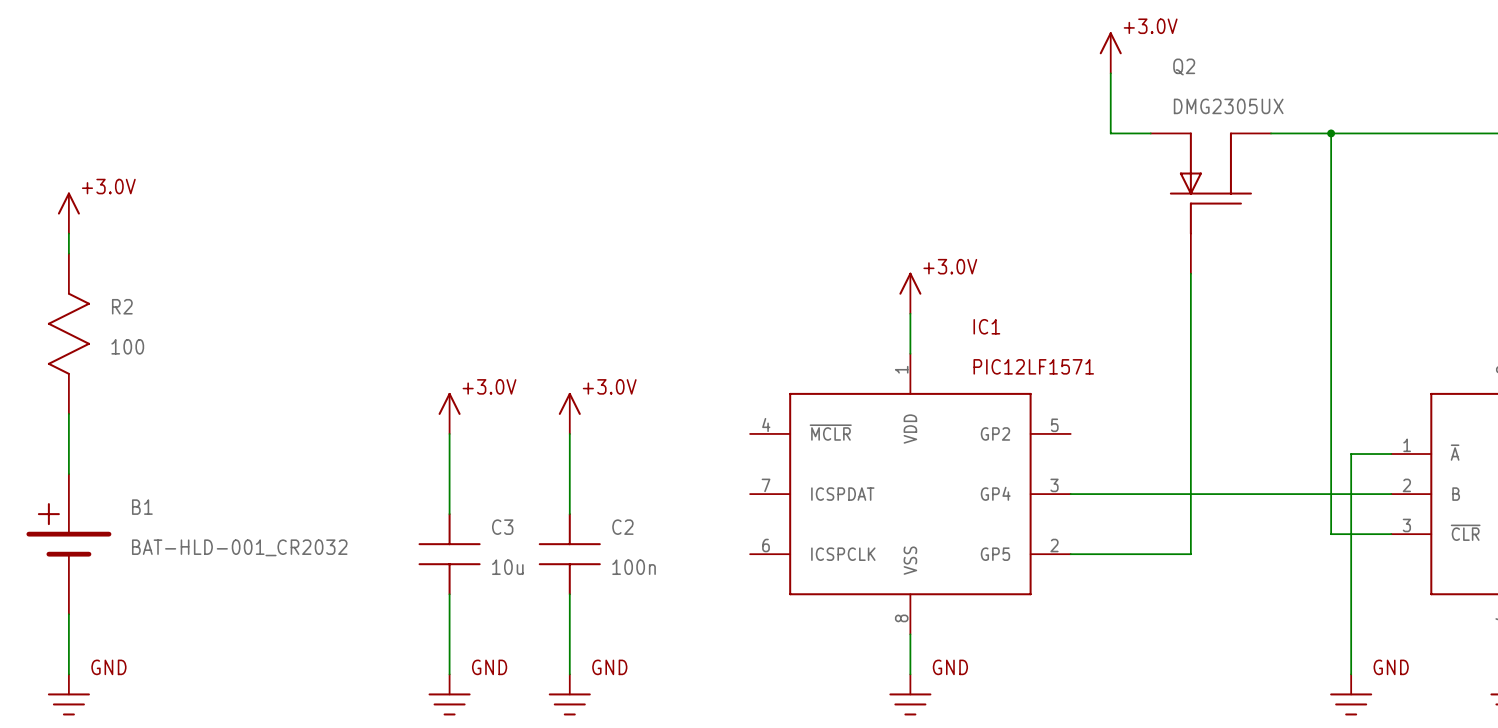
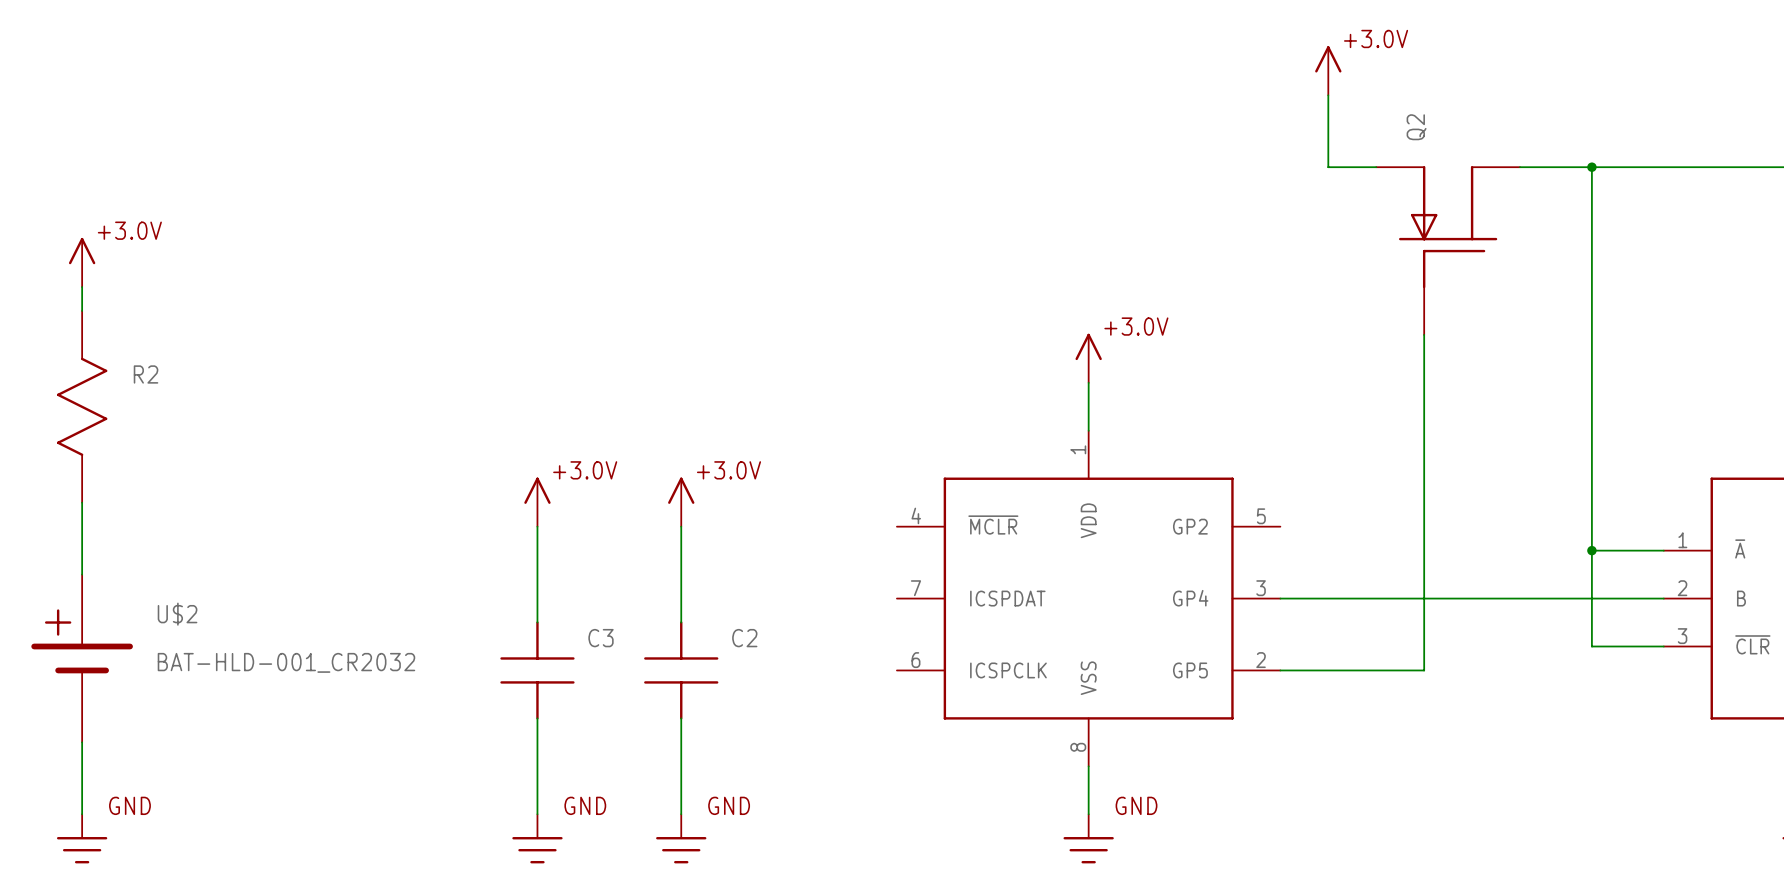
Q2 name rotation: 0° (1184, 66) -> 90° counterclockwise (1416, 127)
Q2 value: DMG2305UX (1228, 106) -> none
IC1 name: IC1 (986, 326) -> none
R2 value: 100 (127, 346) -> none
IC1 value: PIC12LF1571 (1033, 366) -> none
junction: none -> (1591, 550)
wire: (1351, 454) (1351, 674) -> (1615, 550) (1591, 550)
B1 name: B1 (142, 507) -> U$2 (177, 614)
C3 value: 10u (507, 567) -> none
C2 value: 100n (634, 567) -> none
power symbol: GND (1351, 694) -> none

